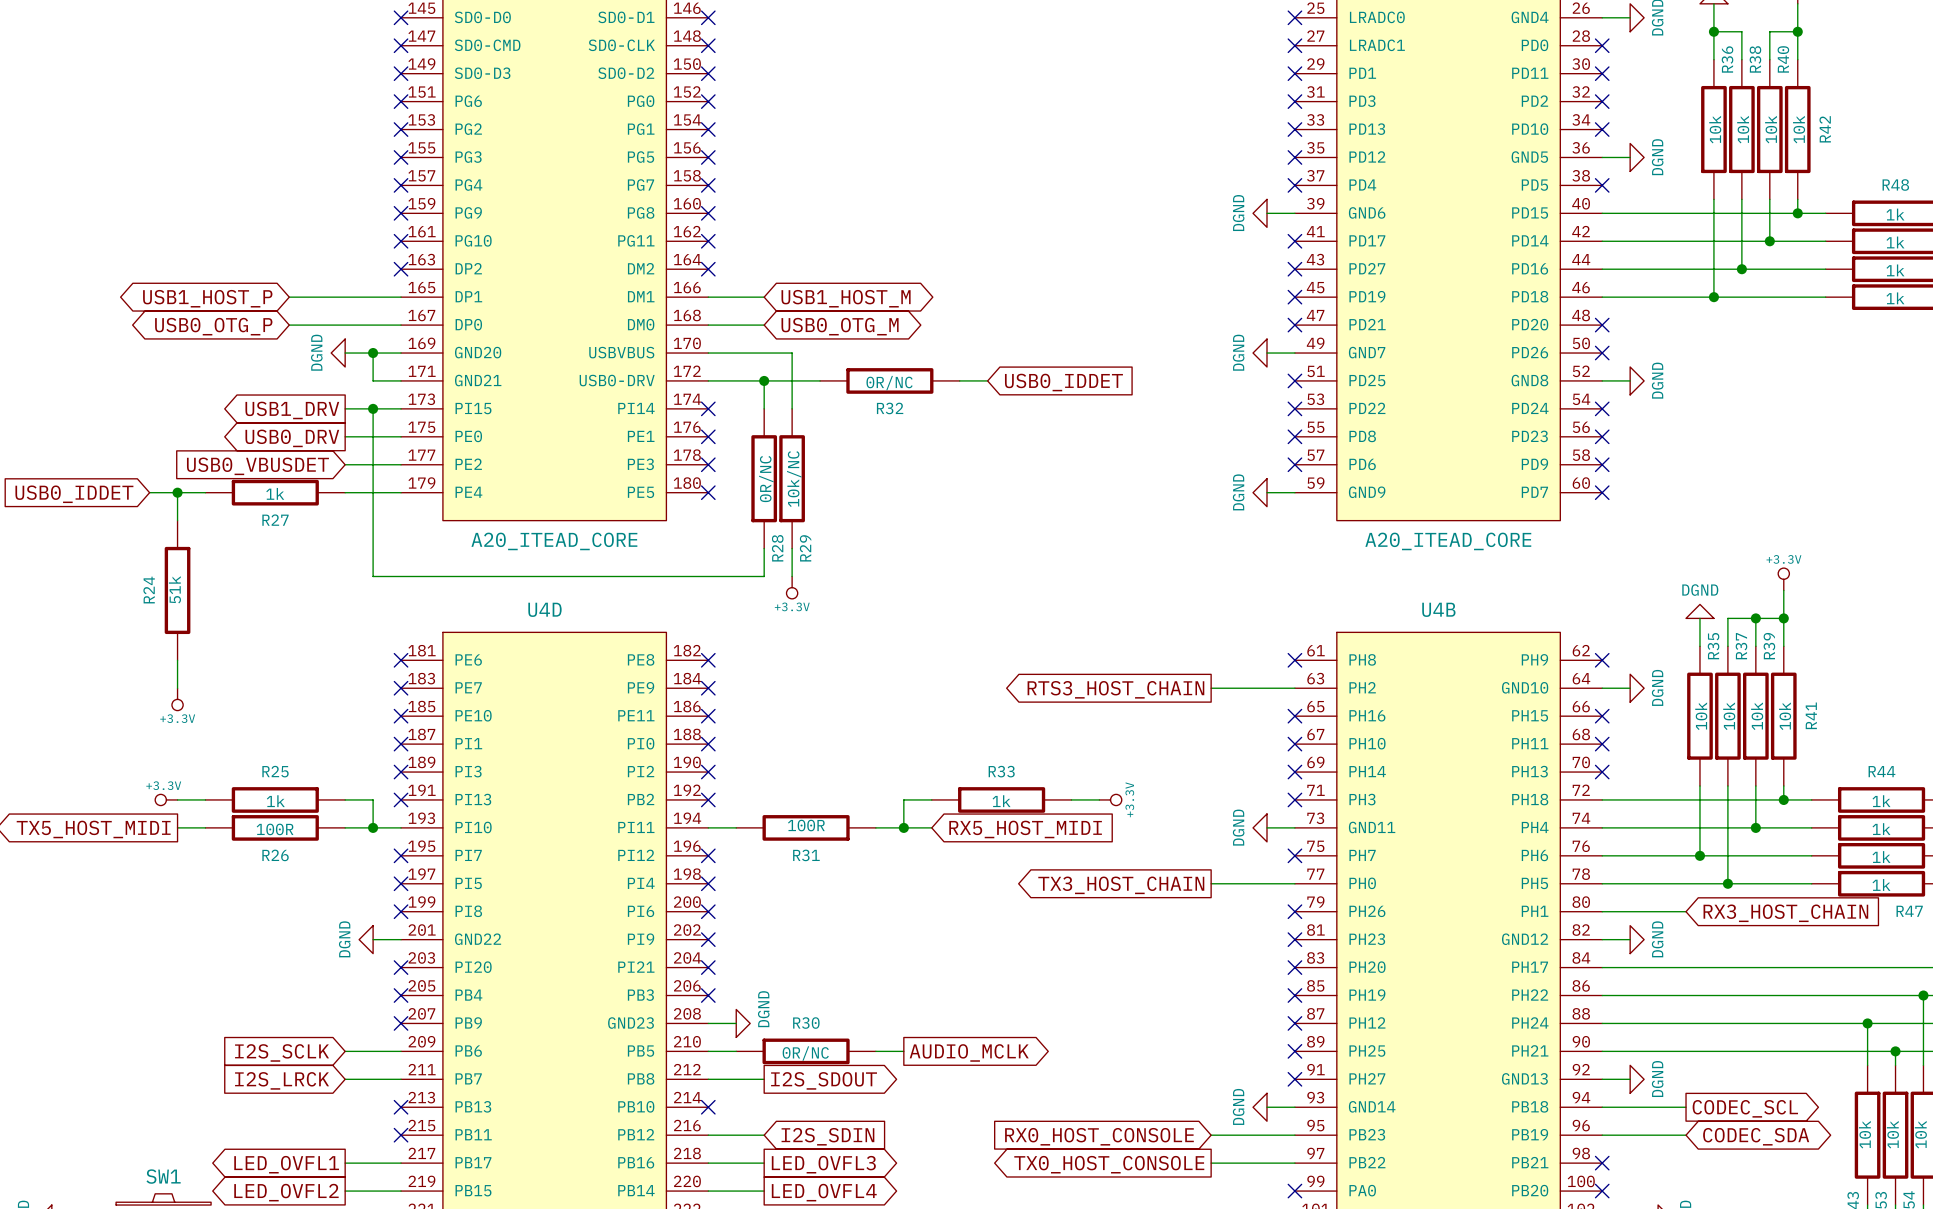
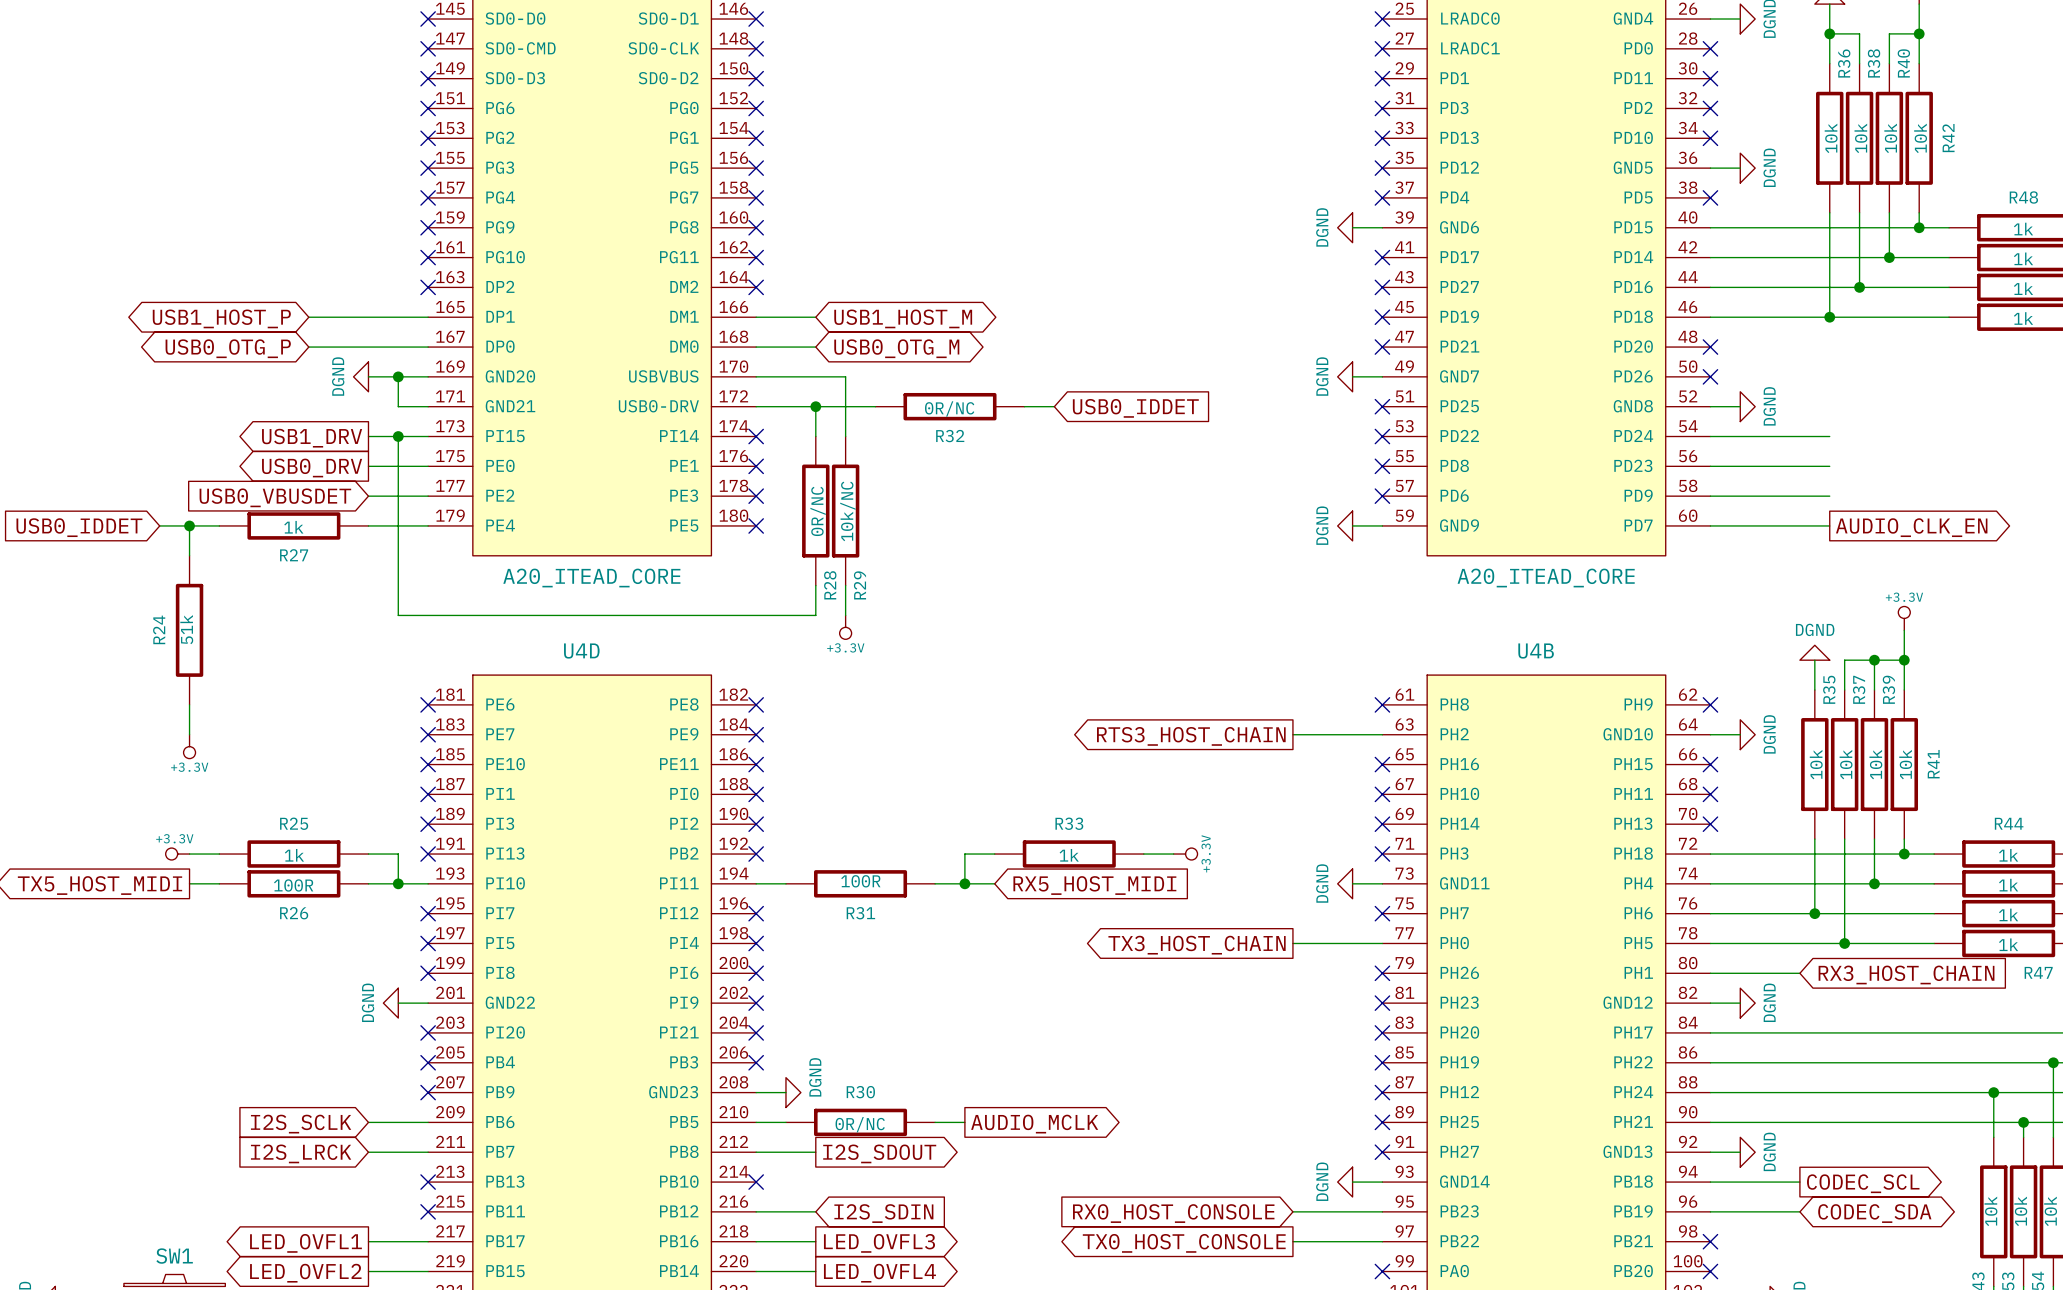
wire: none -> (1710, 436) (1829, 436)
no-connect mark: (1602, 408) -> none
wire: none -> (1710, 466) (1829, 466)
no-connect mark: (1602, 436) -> none
wire: none -> (1710, 496) (1829, 496)
no-connect mark: (1602, 464) -> none
wire: none -> (1710, 525) (1829, 525)
no-connect mark: (1602, 492) -> none
global label: none -> AUDIO_CLK_EN (1911, 527)

